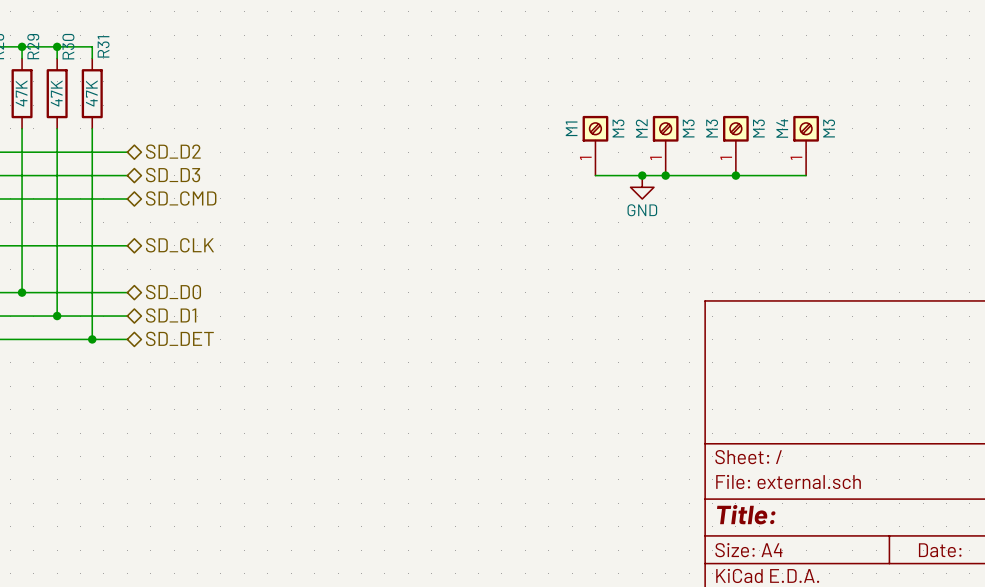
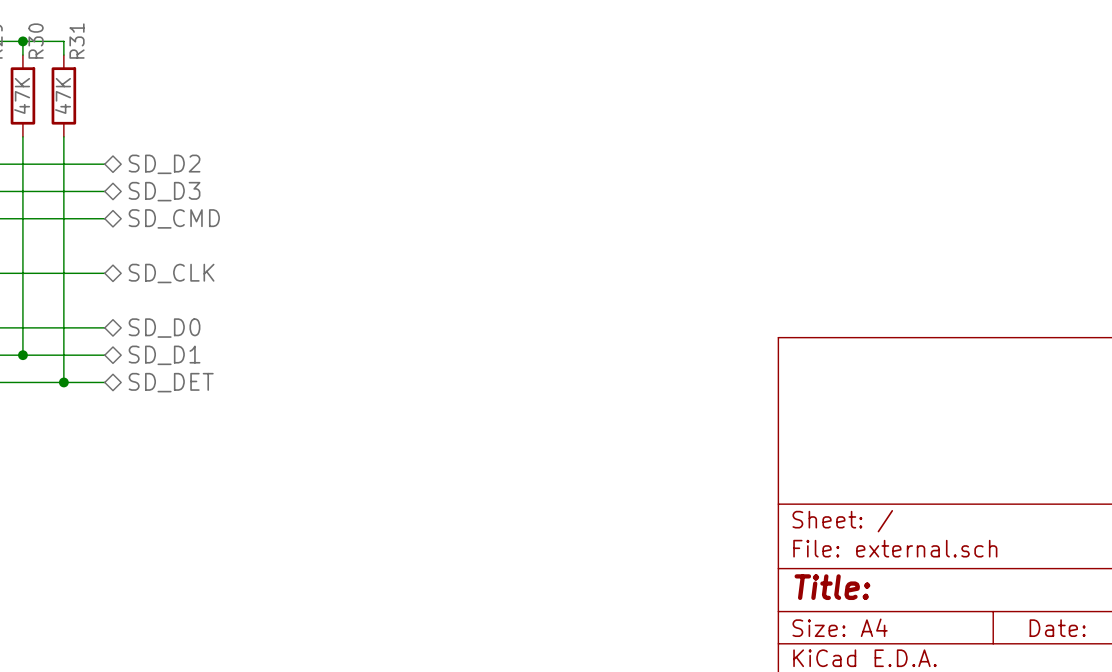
M1: M3 (595, 145) -> none
M2: M3 (665, 145) -> none
M3: M3 (735, 145) -> none
M4: M3 (806, 145) -> none
wire: (595, 175) (806, 175) -> none
junction: (642, 175) -> none
junction: (665, 175) -> none
junction: (735, 175) -> none
power symbol: GND (642, 187) -> none

